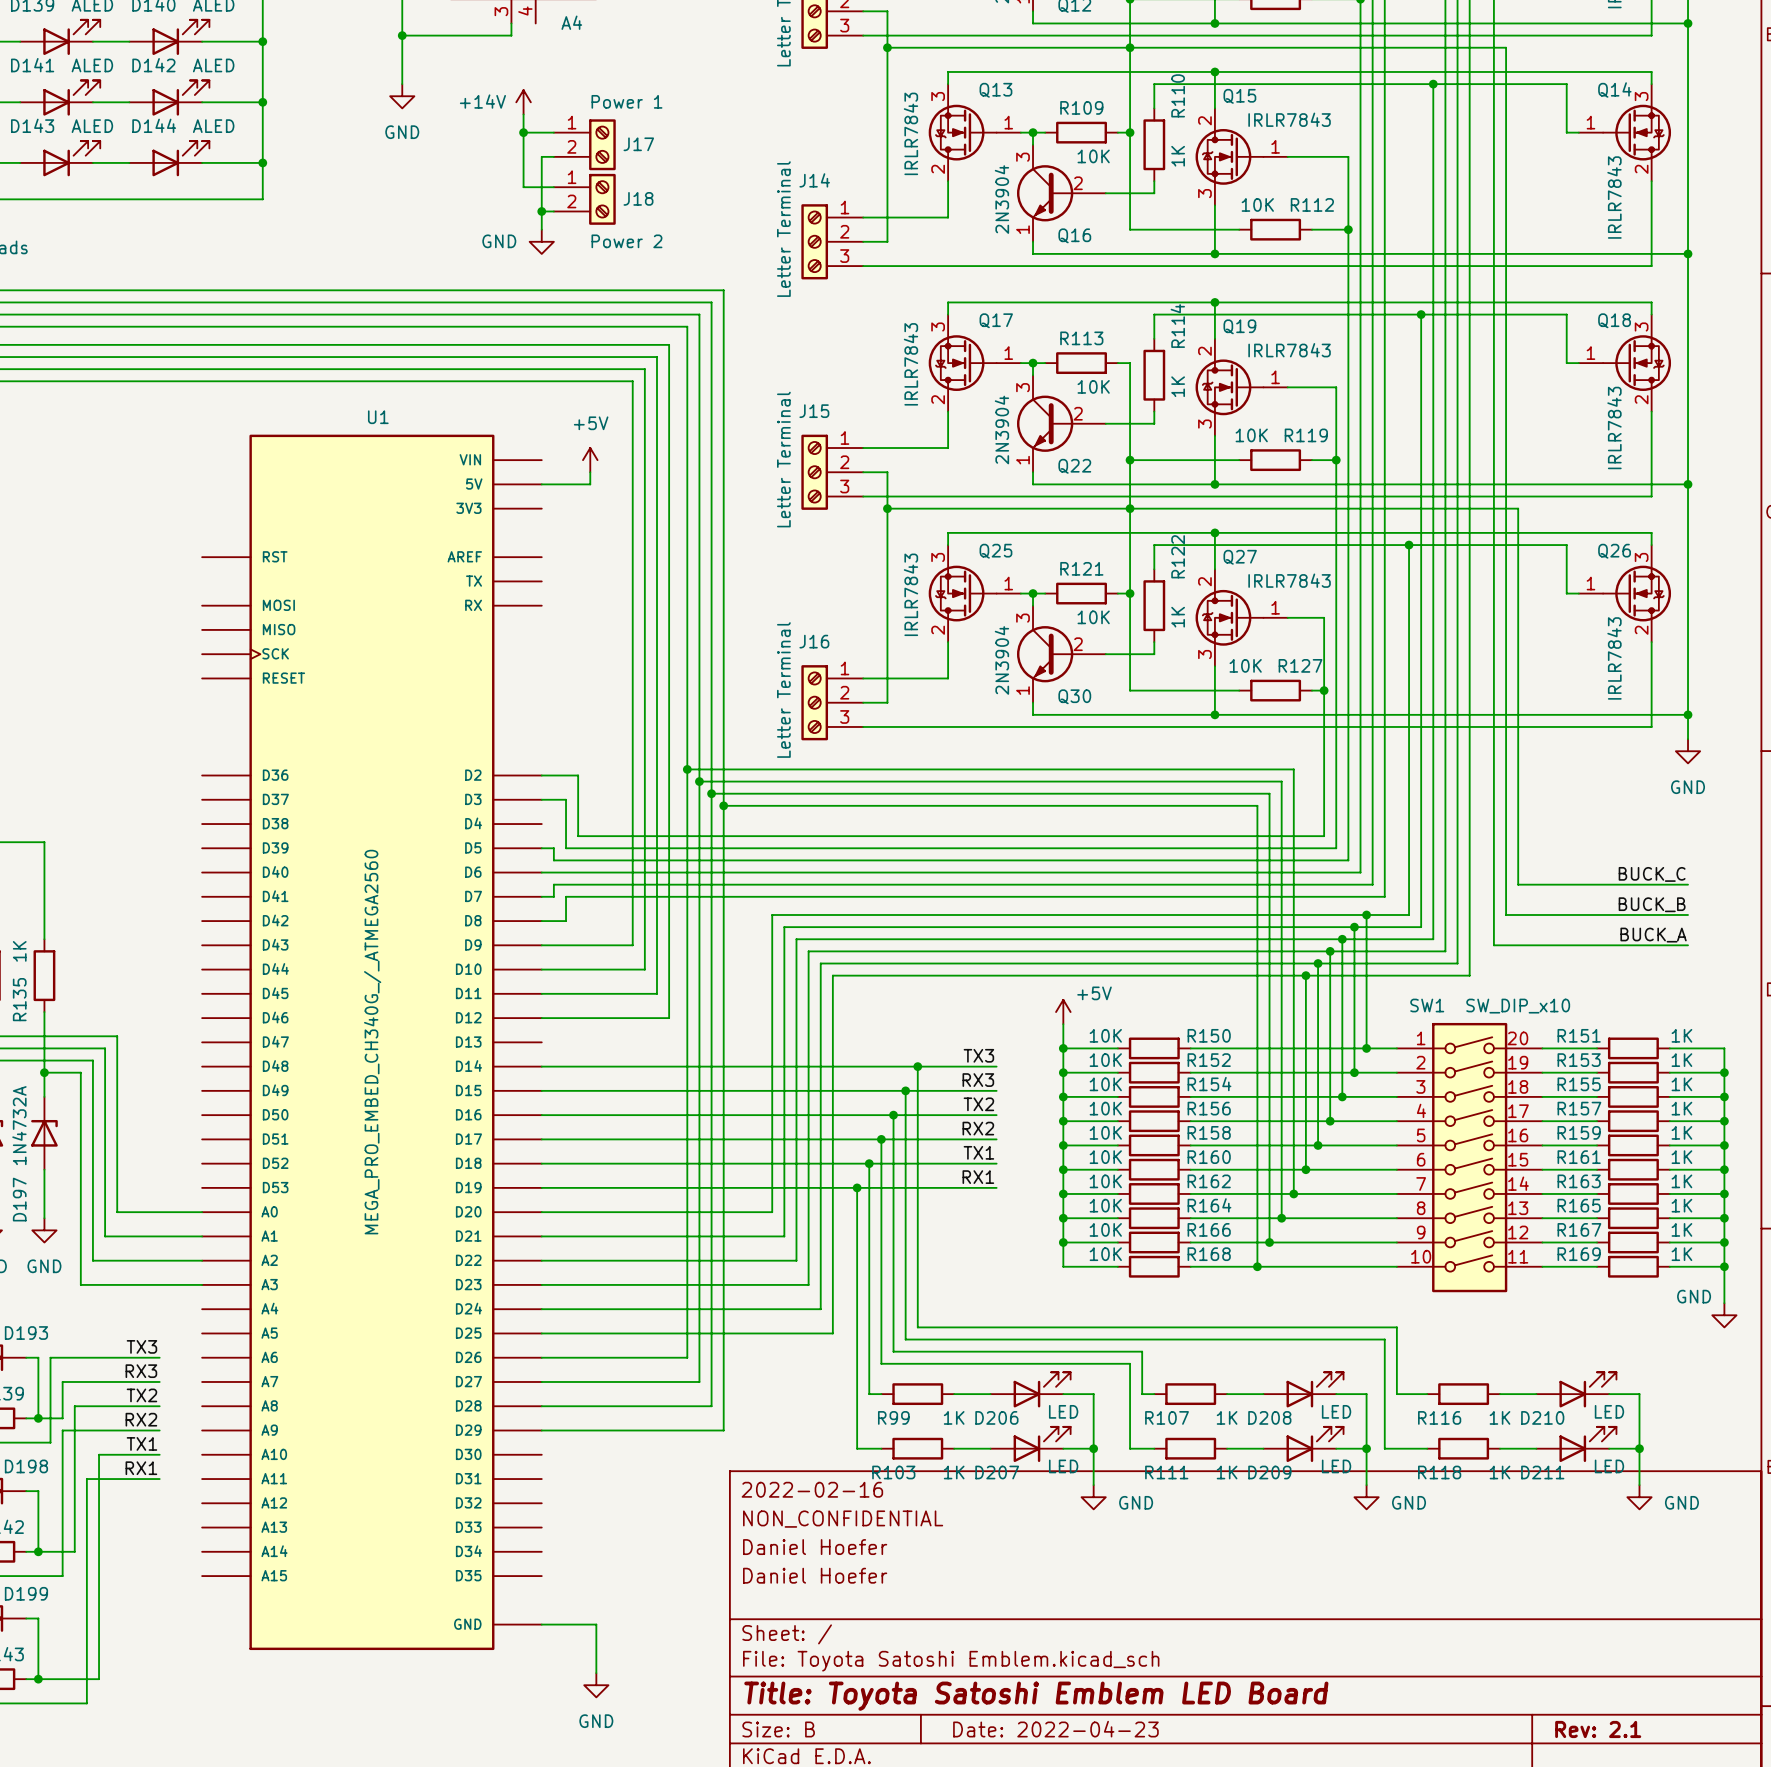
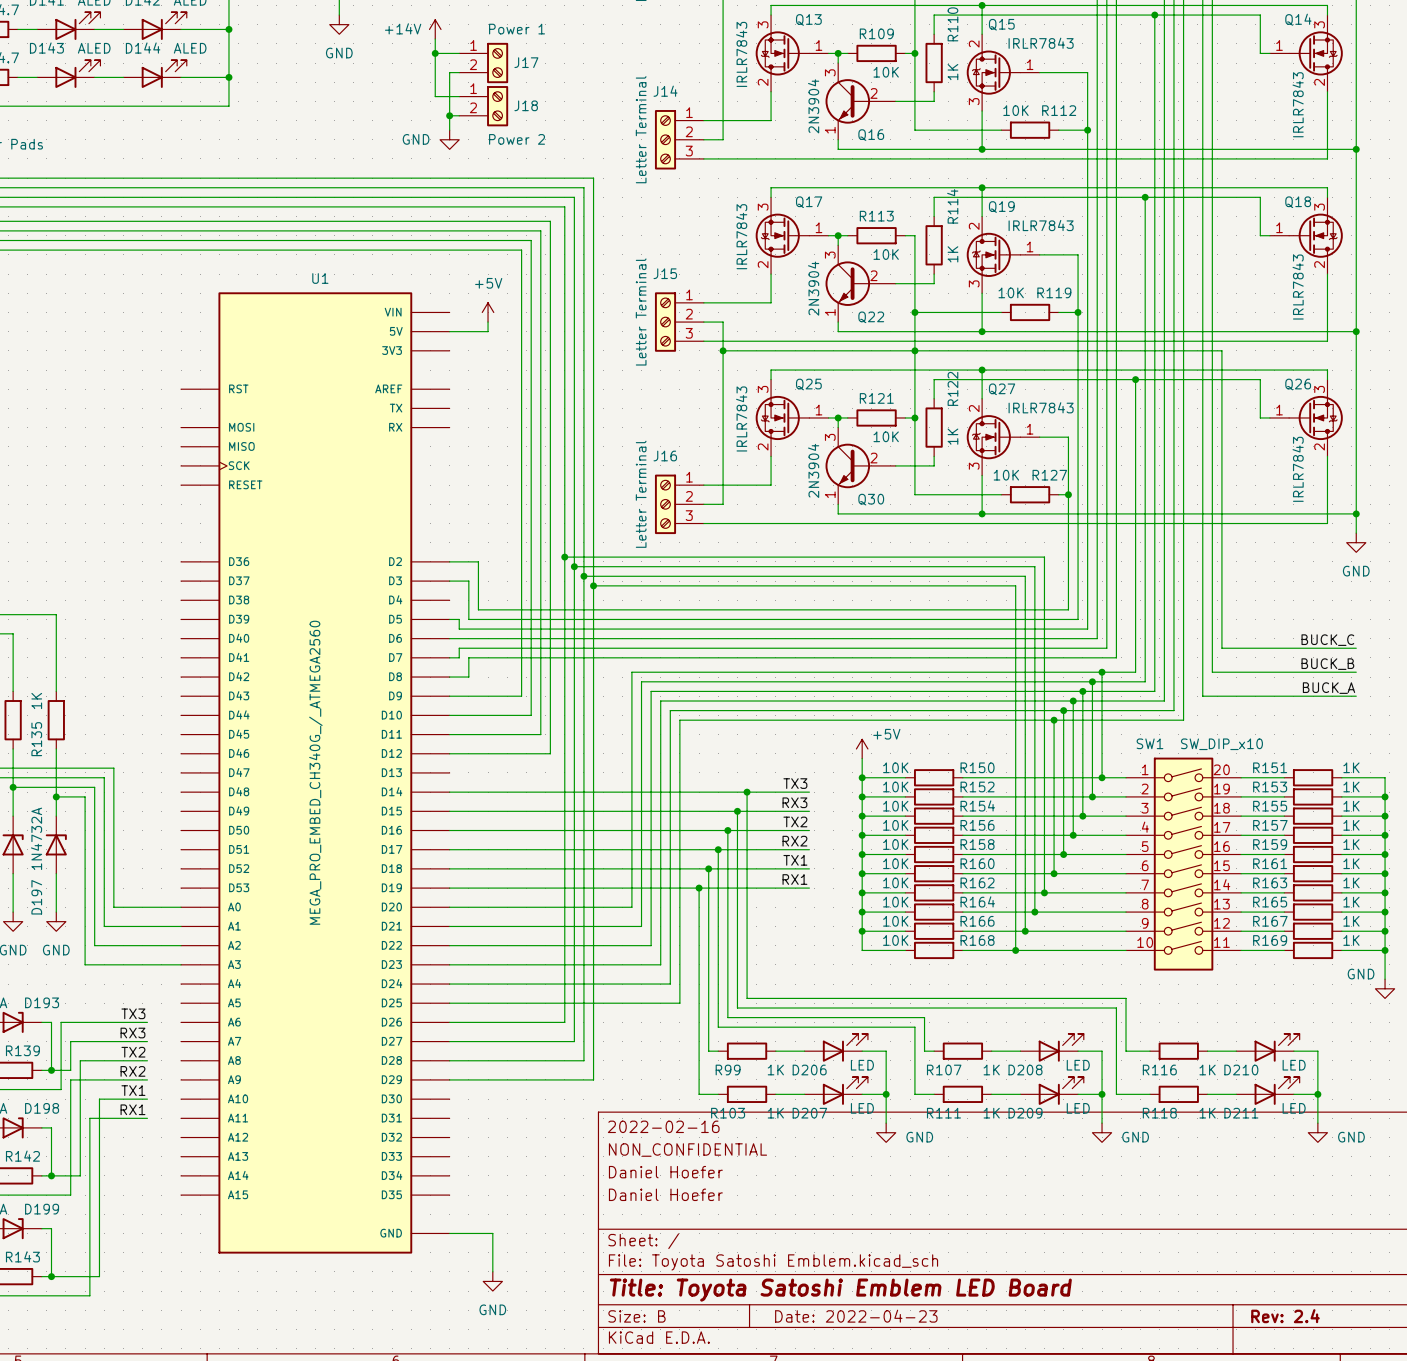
title block: Rev: 2.1 (1598, 1729) -> Rev: 2.4 (1285, 1316)

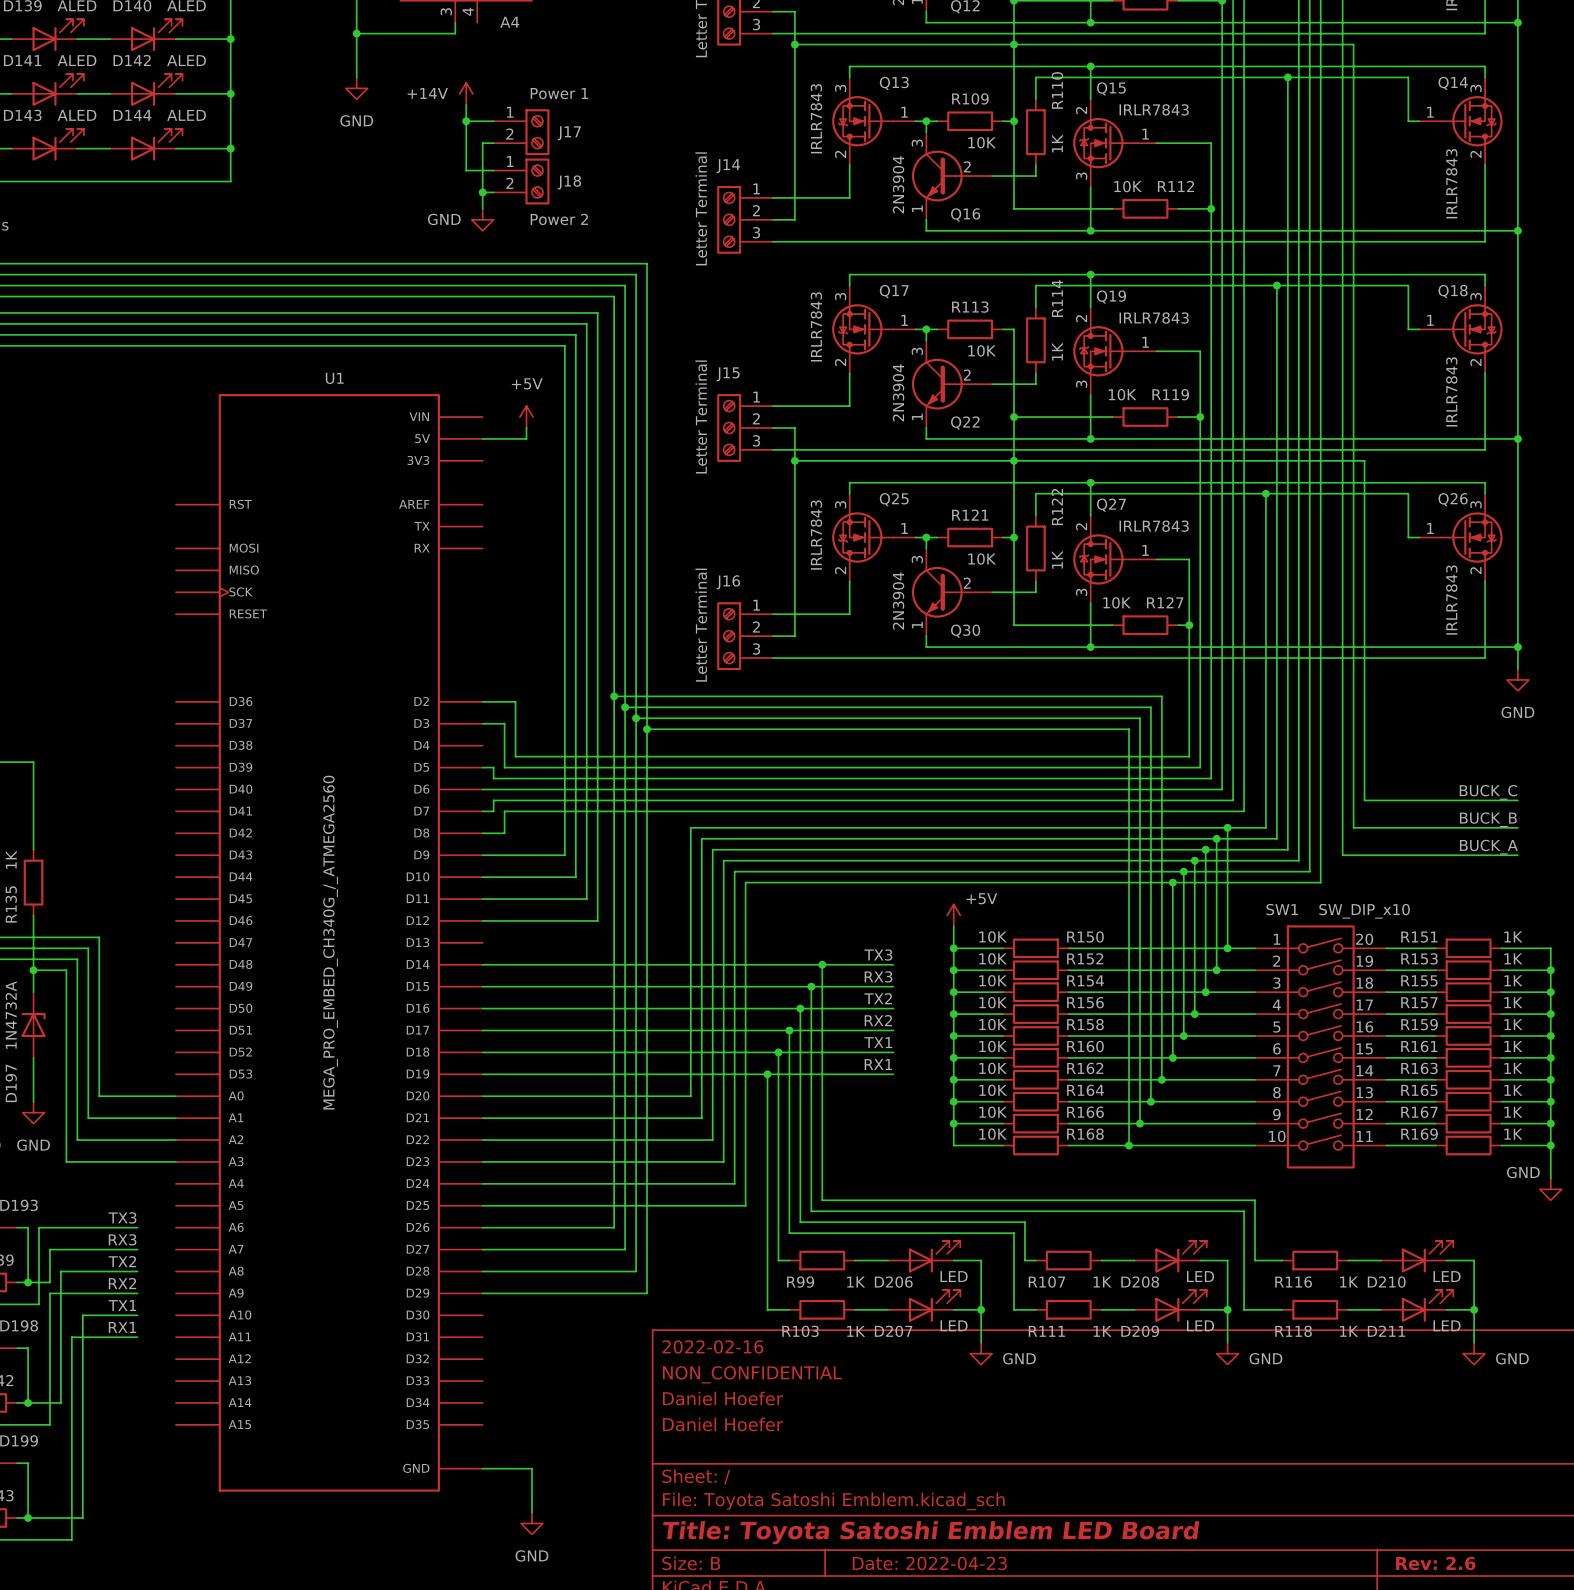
title block: Rev: 2.4 (1285, 1316) -> Rev: 2.6 (1435, 1563)

